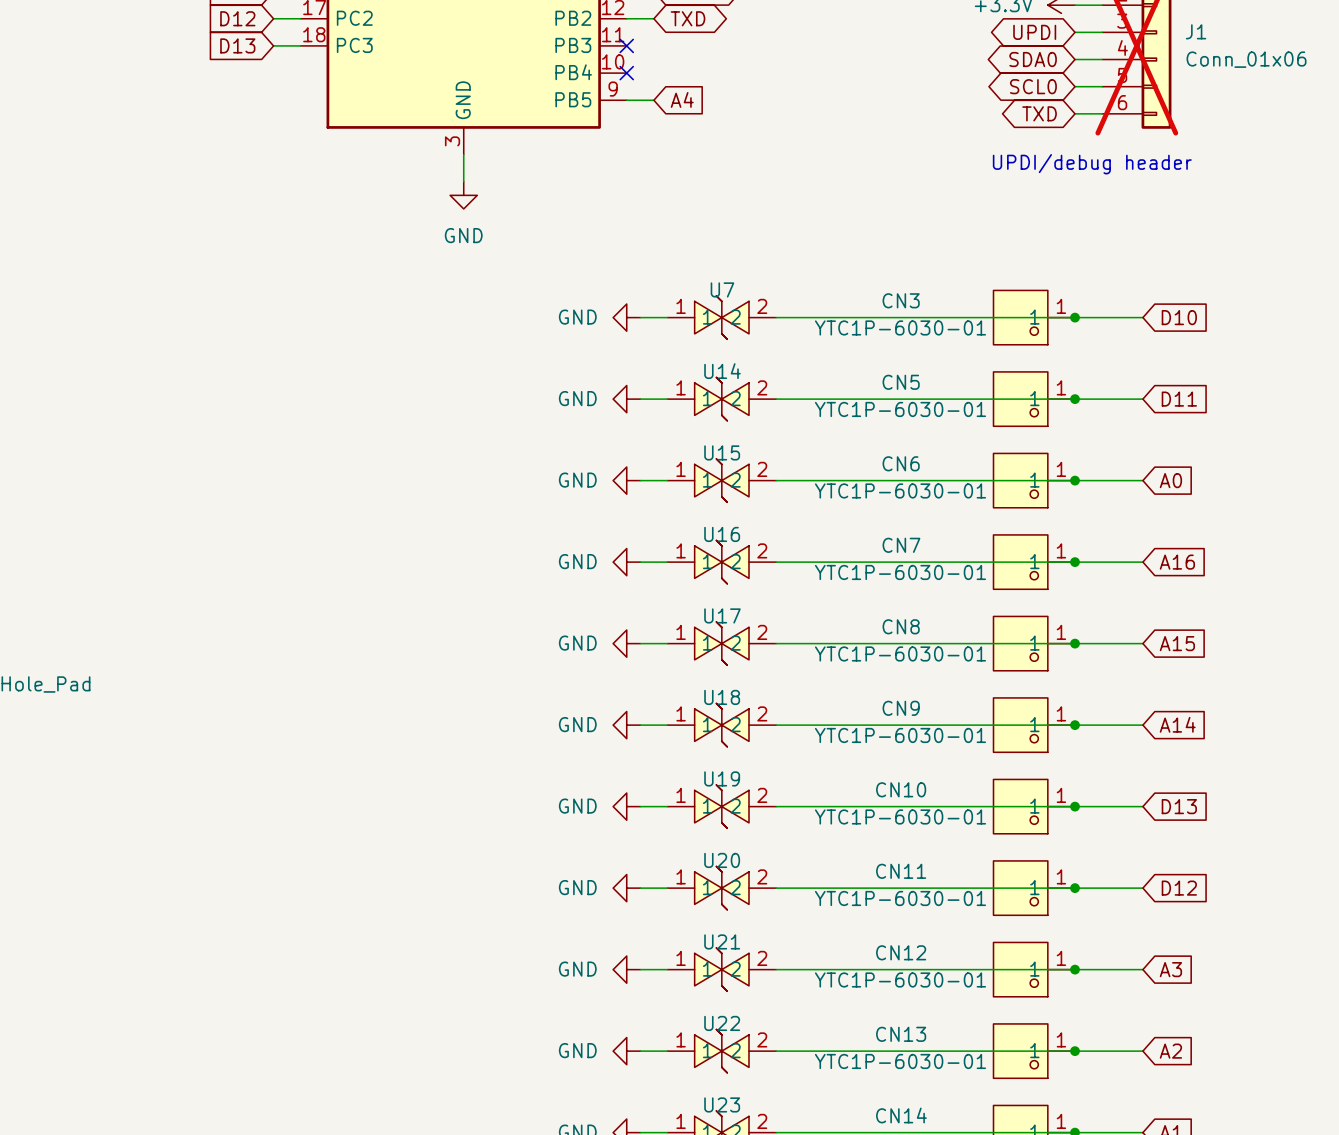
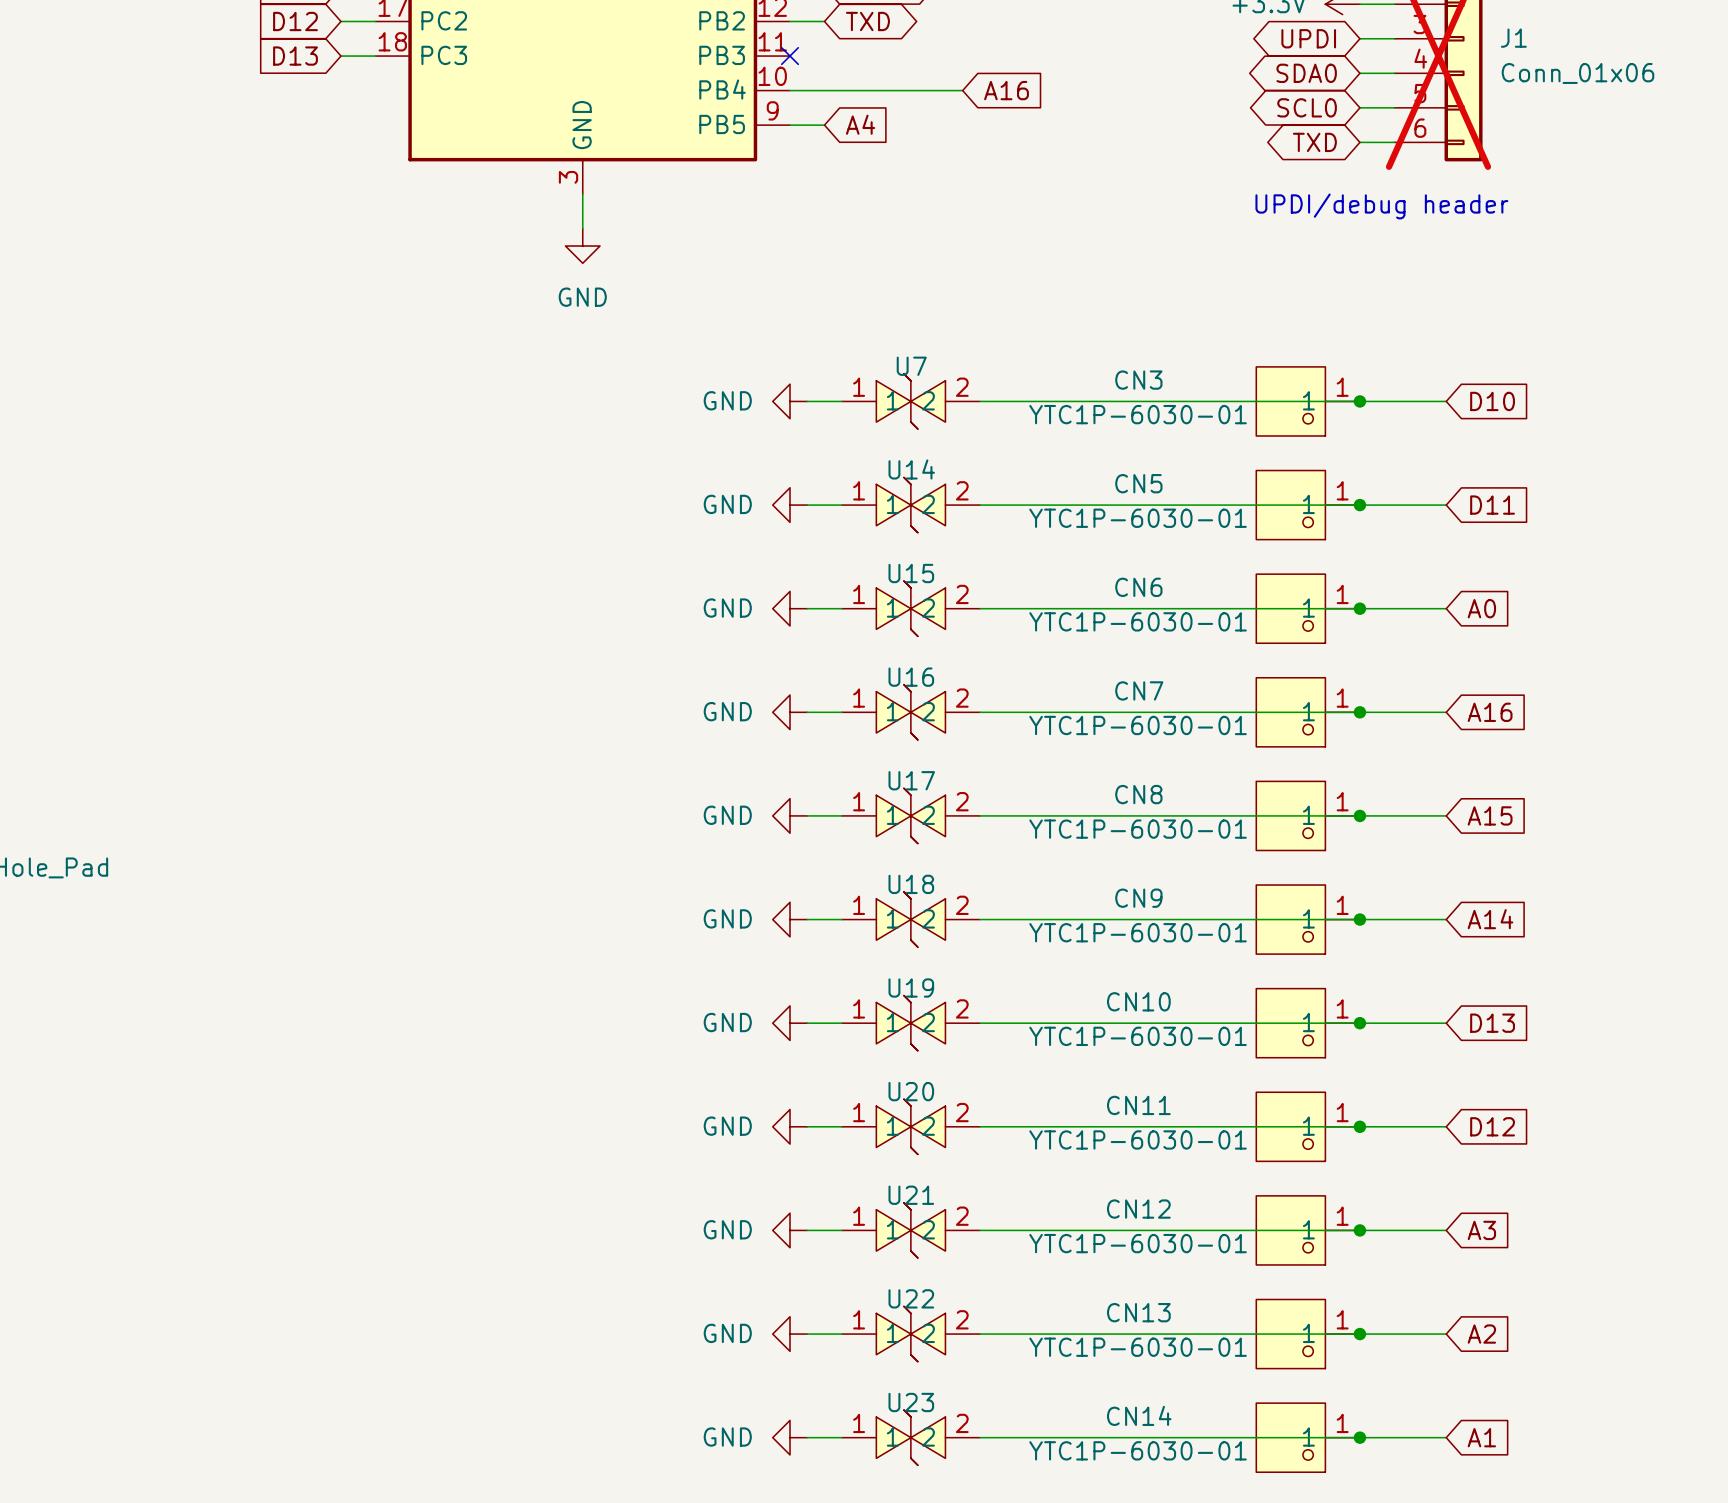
wire: none -> (790, 90) (962, 90)
no-connect mark: (626, 73) -> none
global label: none -> A16 (1006, 90)

